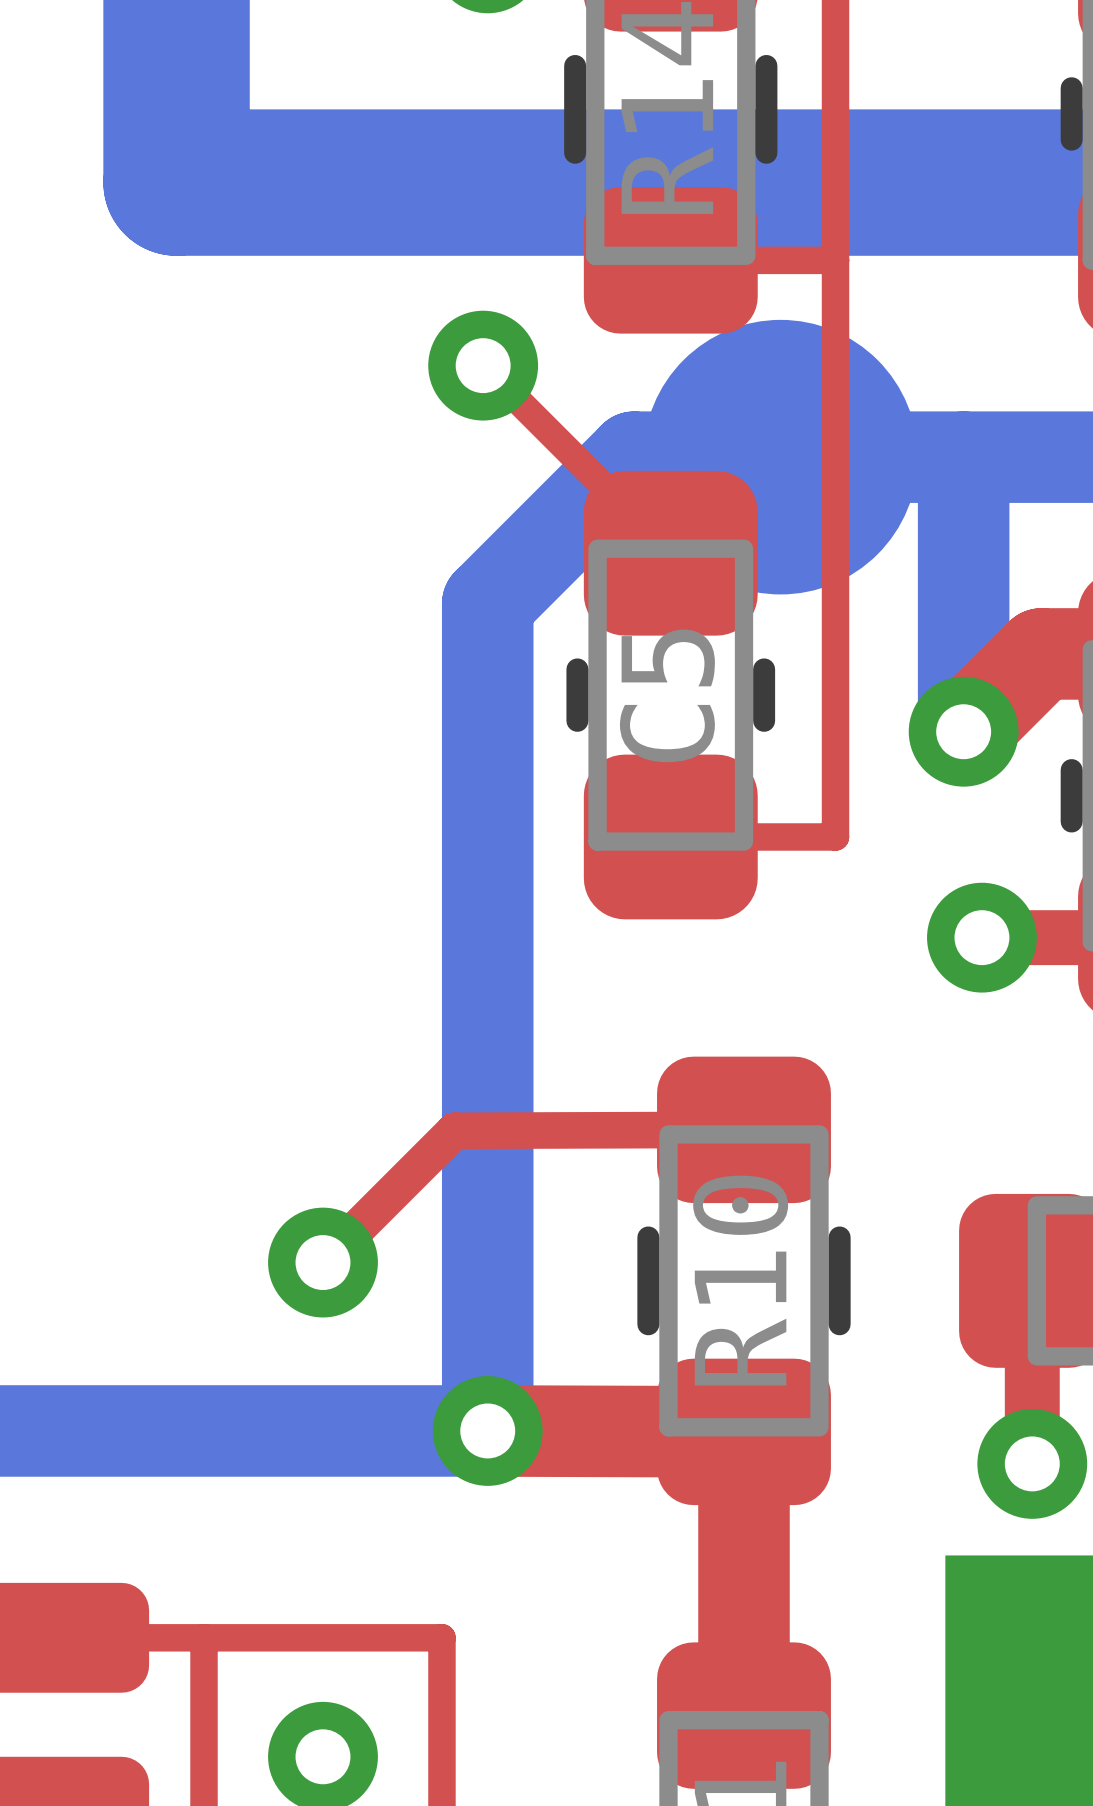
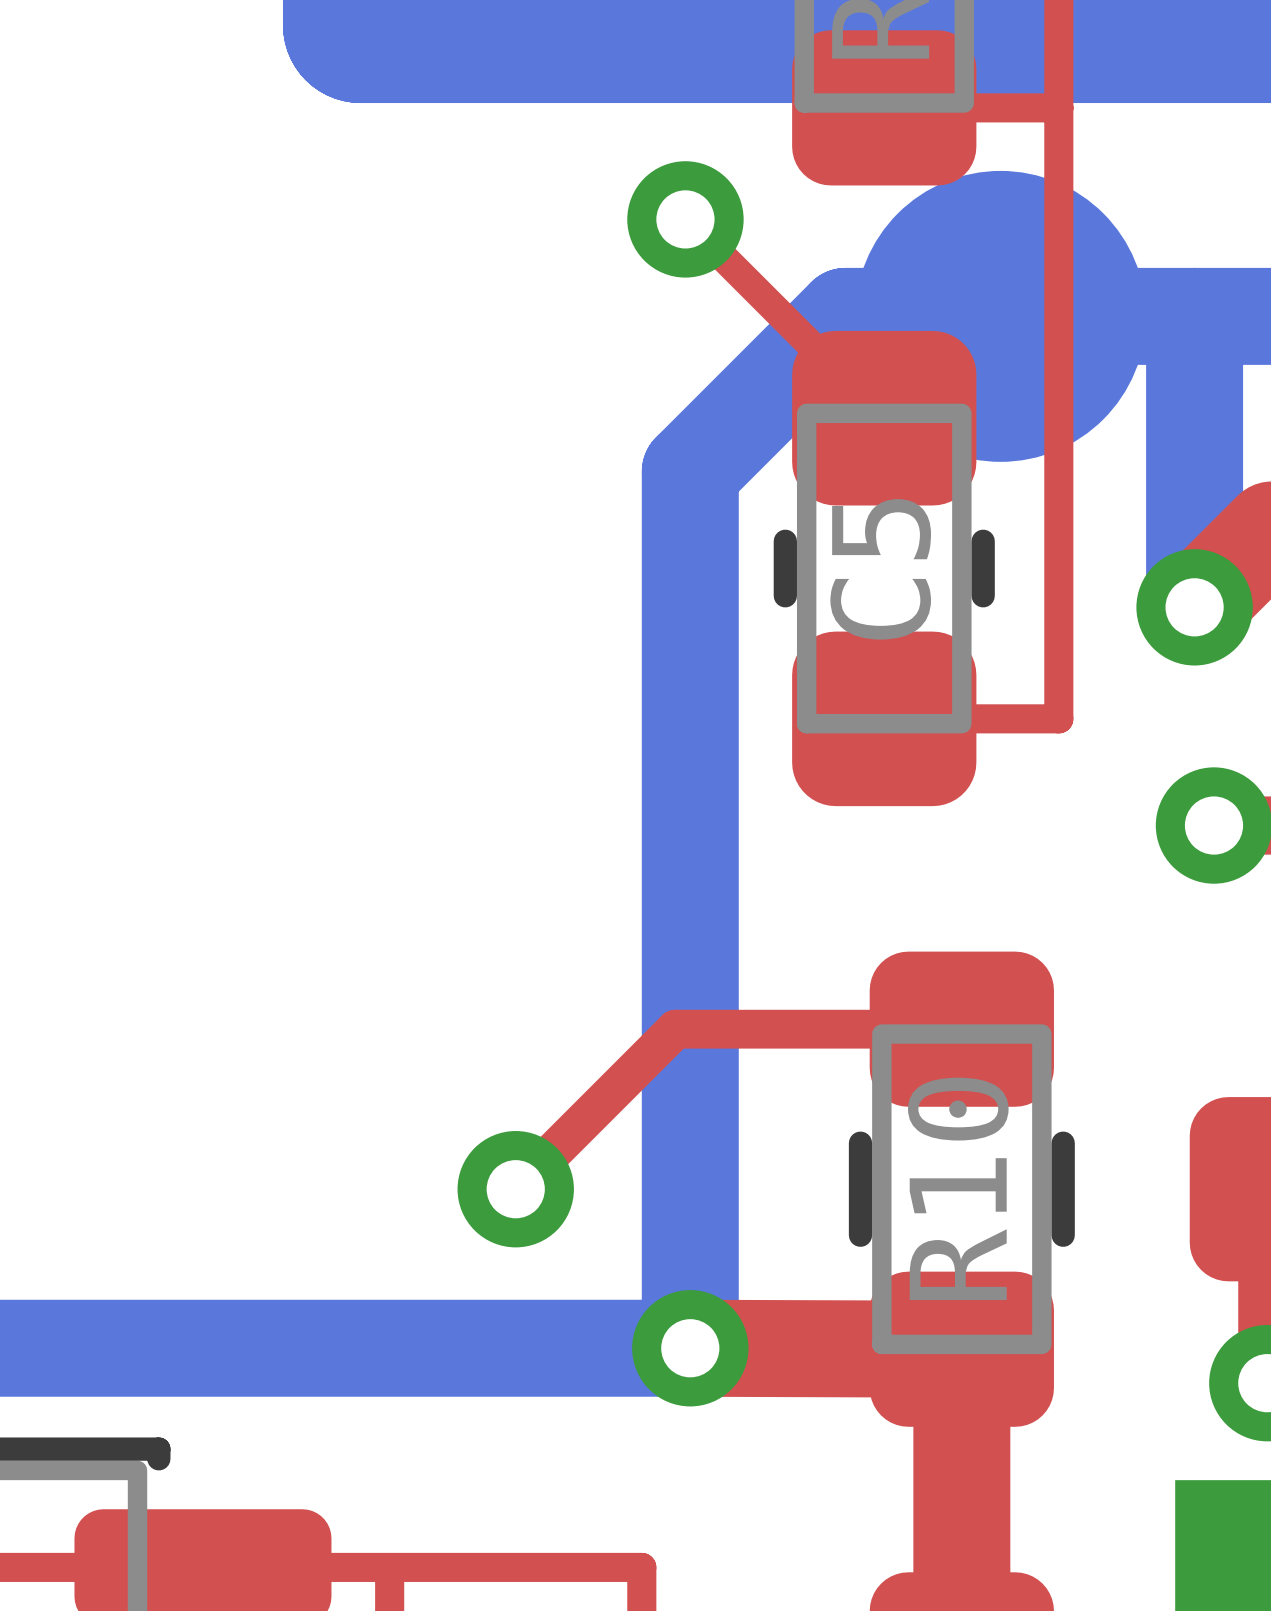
top track: (743, 1129) (454, 1130) (322, 1262) -> (961, 1029) (675, 1029) (515, 1189)
via position: (322, 1262) -> (515, 1189)

